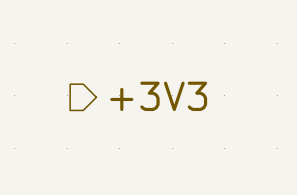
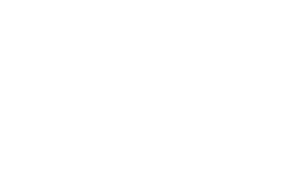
hierarchical label: +3V3 (158, 96) -> none

